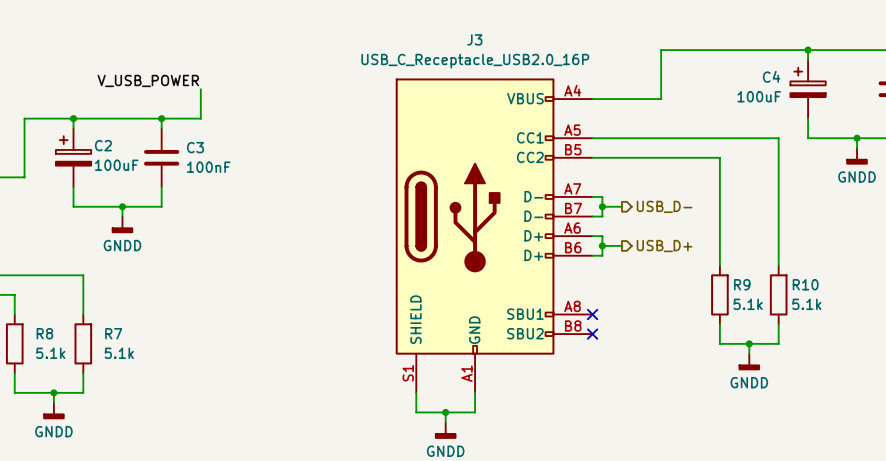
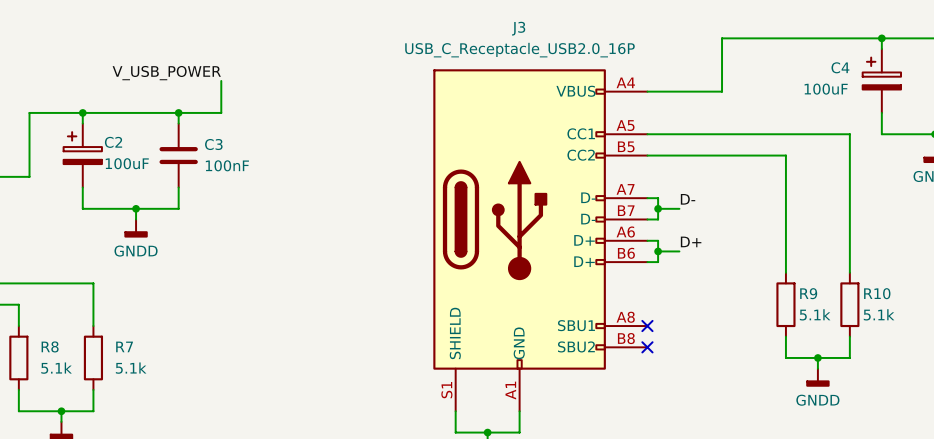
label: none -> D- (688, 199)
hierarchical label: USB_D- (664, 206) -> none
label: none -> D+ (691, 241)
hierarchical label: USB_D+ (664, 246) -> none

